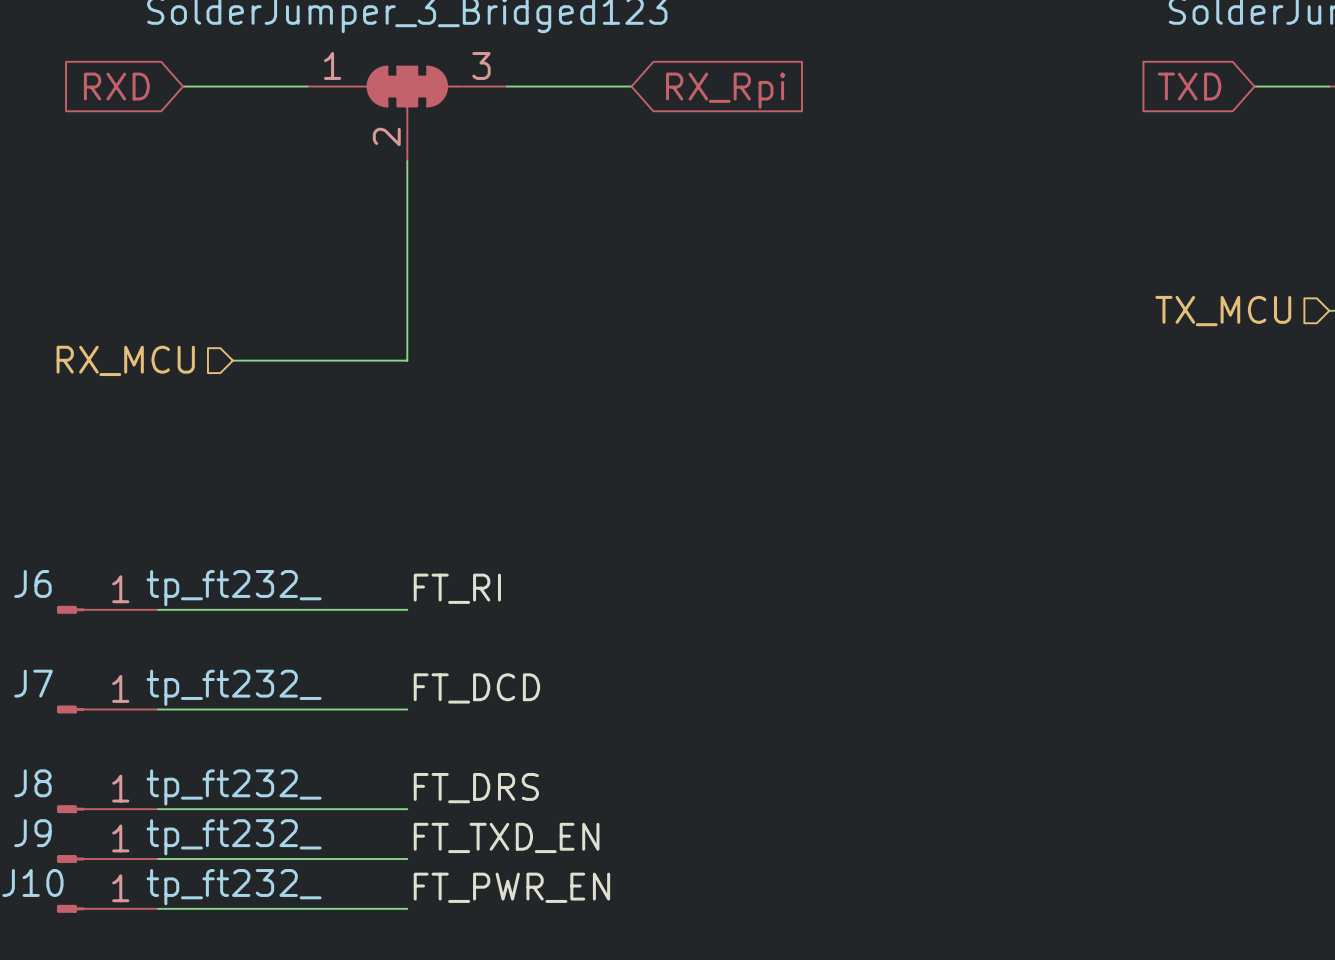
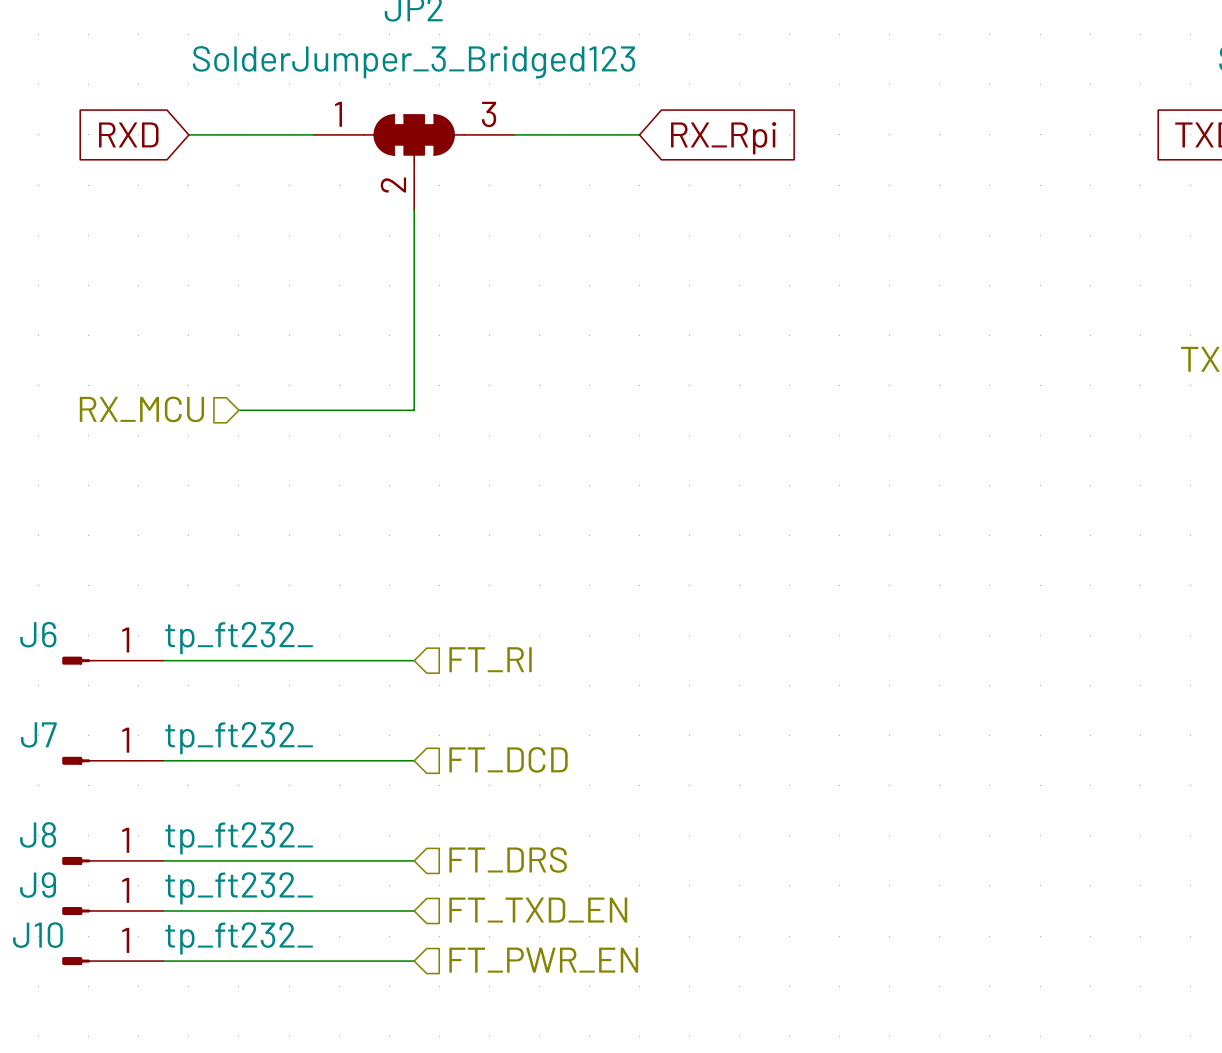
label: FT_RI (457, 588) -> none
hierarchical label: none -> FT_RI (490, 659)
label: FT_DCD (476, 688) -> none
hierarchical label: none -> FT_DCD (508, 759)
label: FT_DRS (476, 788) -> none
hierarchical label: none -> FT_DRS (508, 859)
label: FT_TXD_EN (506, 837) -> none
hierarchical label: none -> FT_TXD_EN (538, 910)
label: FT_PWR_EN (511, 887) -> none
hierarchical label: none -> FT_PWR_EN (543, 960)

